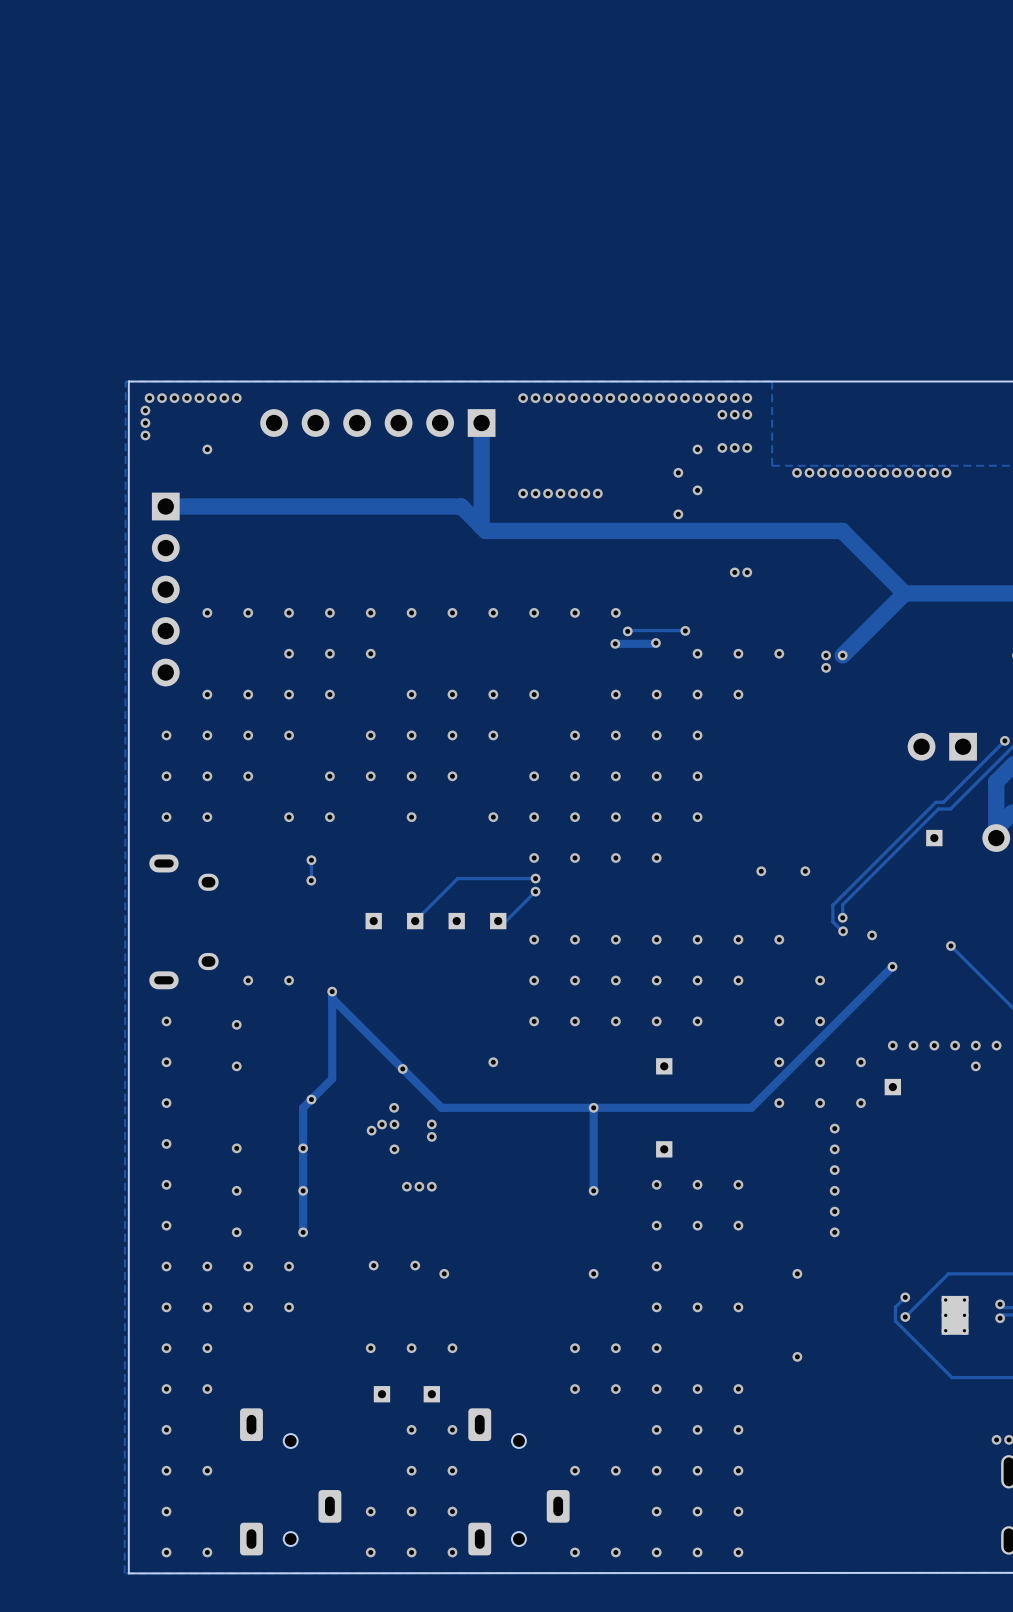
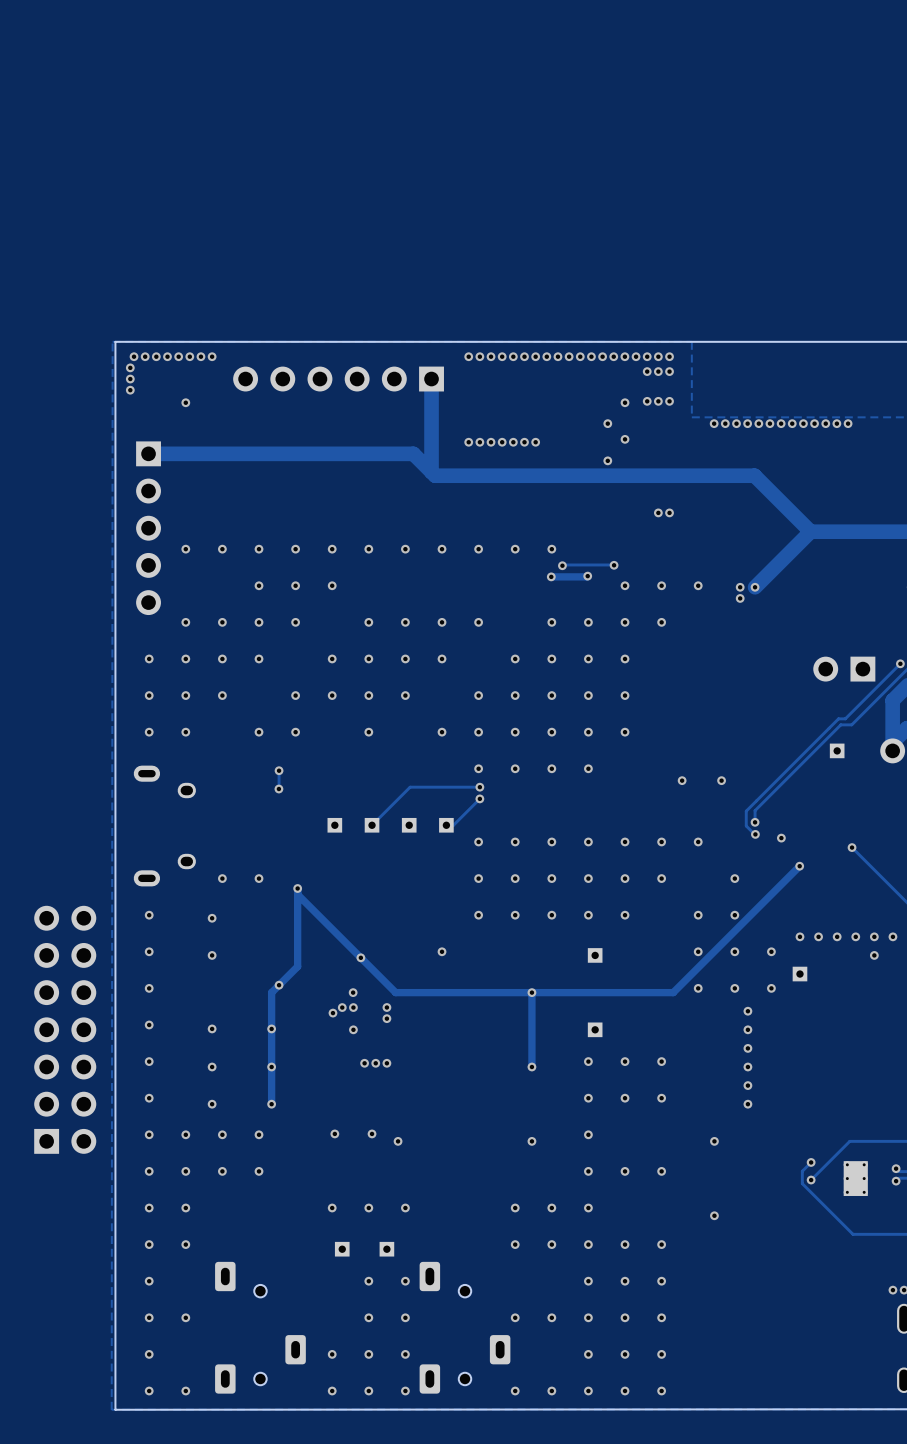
part: none -> (65, 1029)

